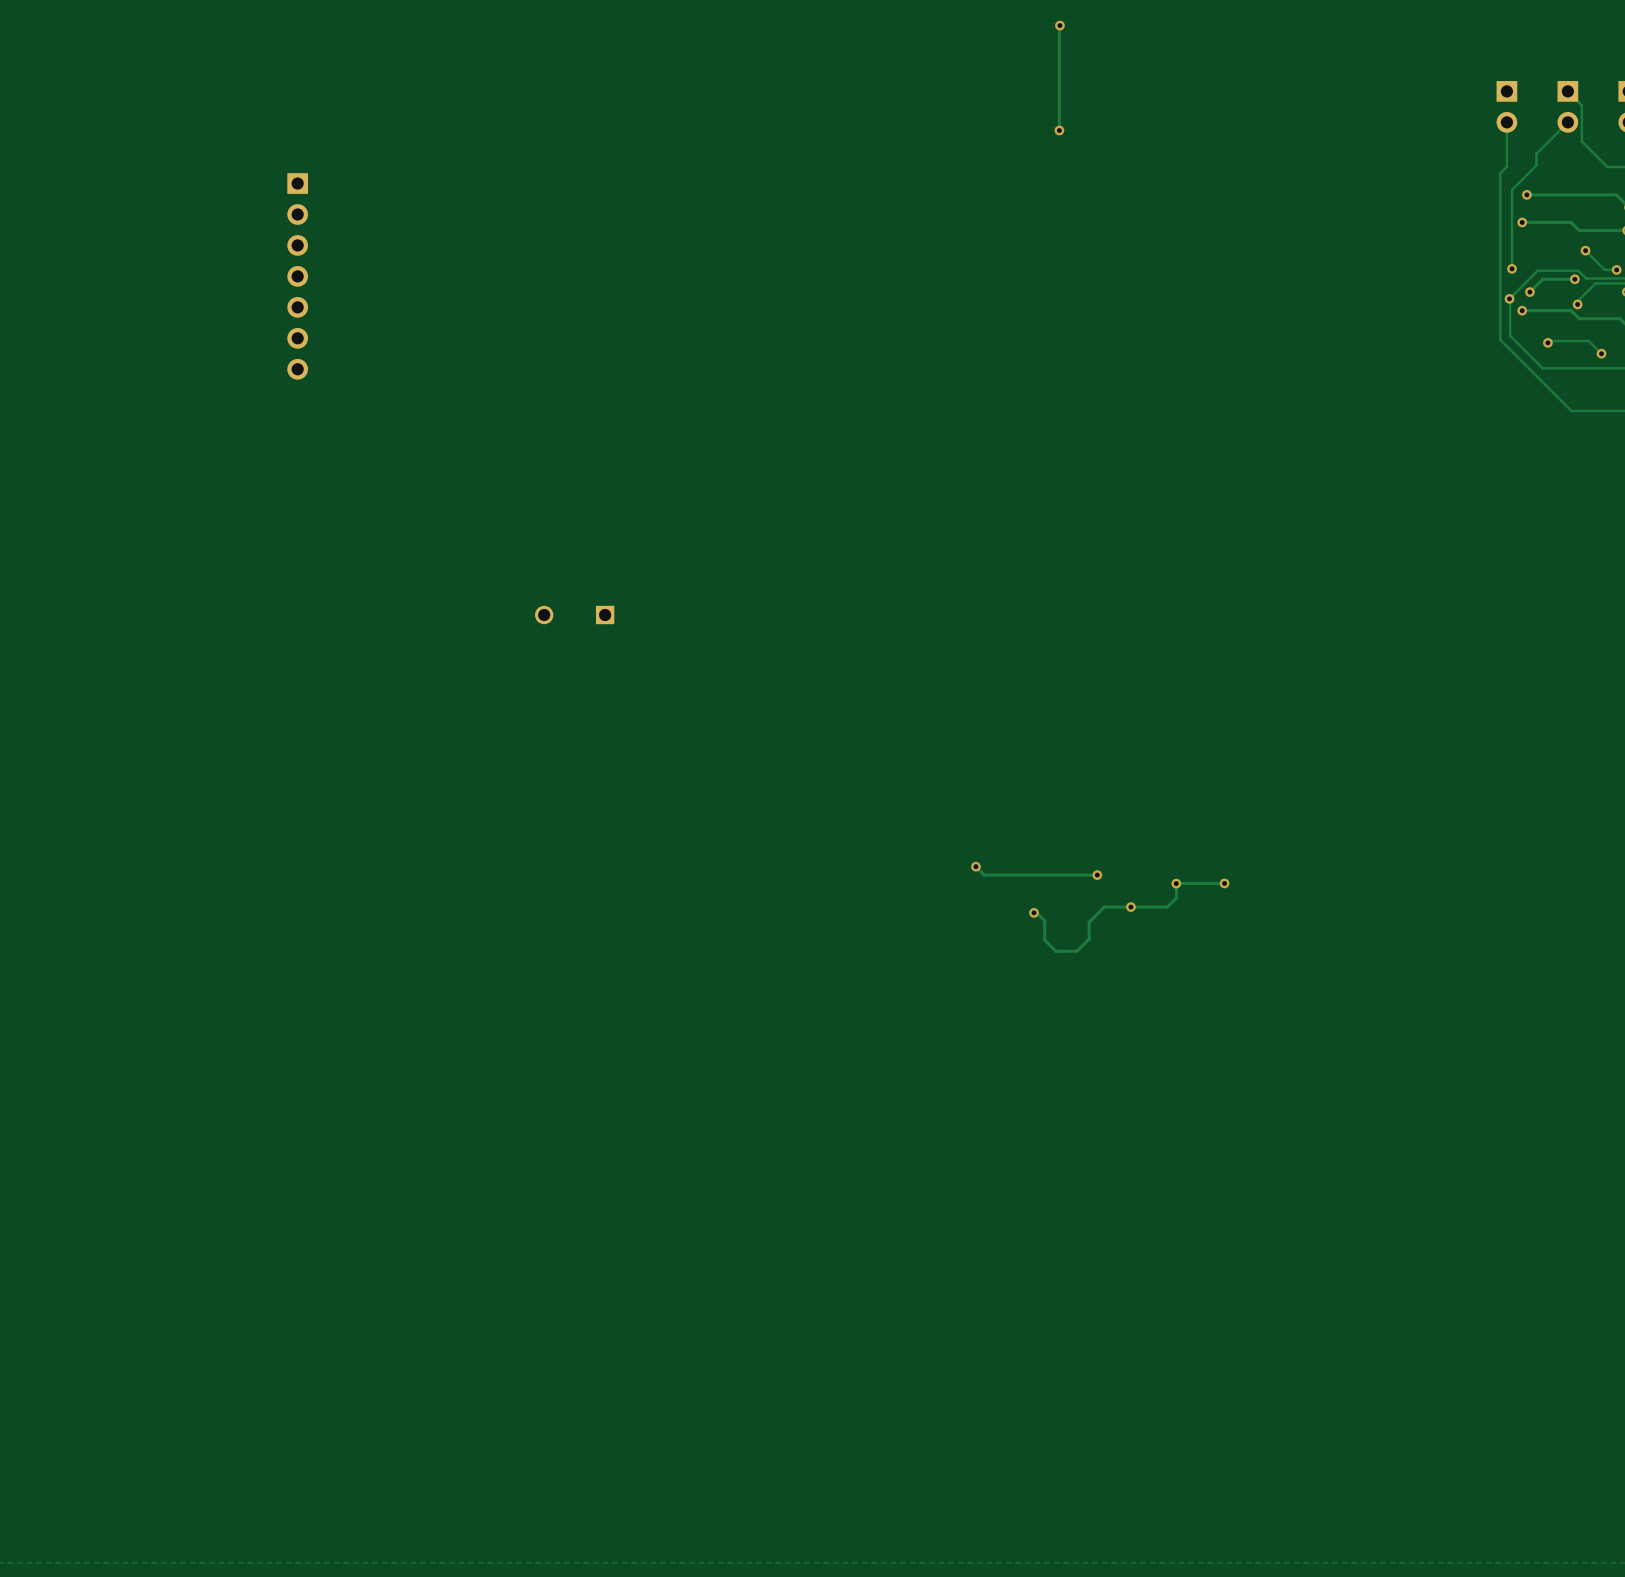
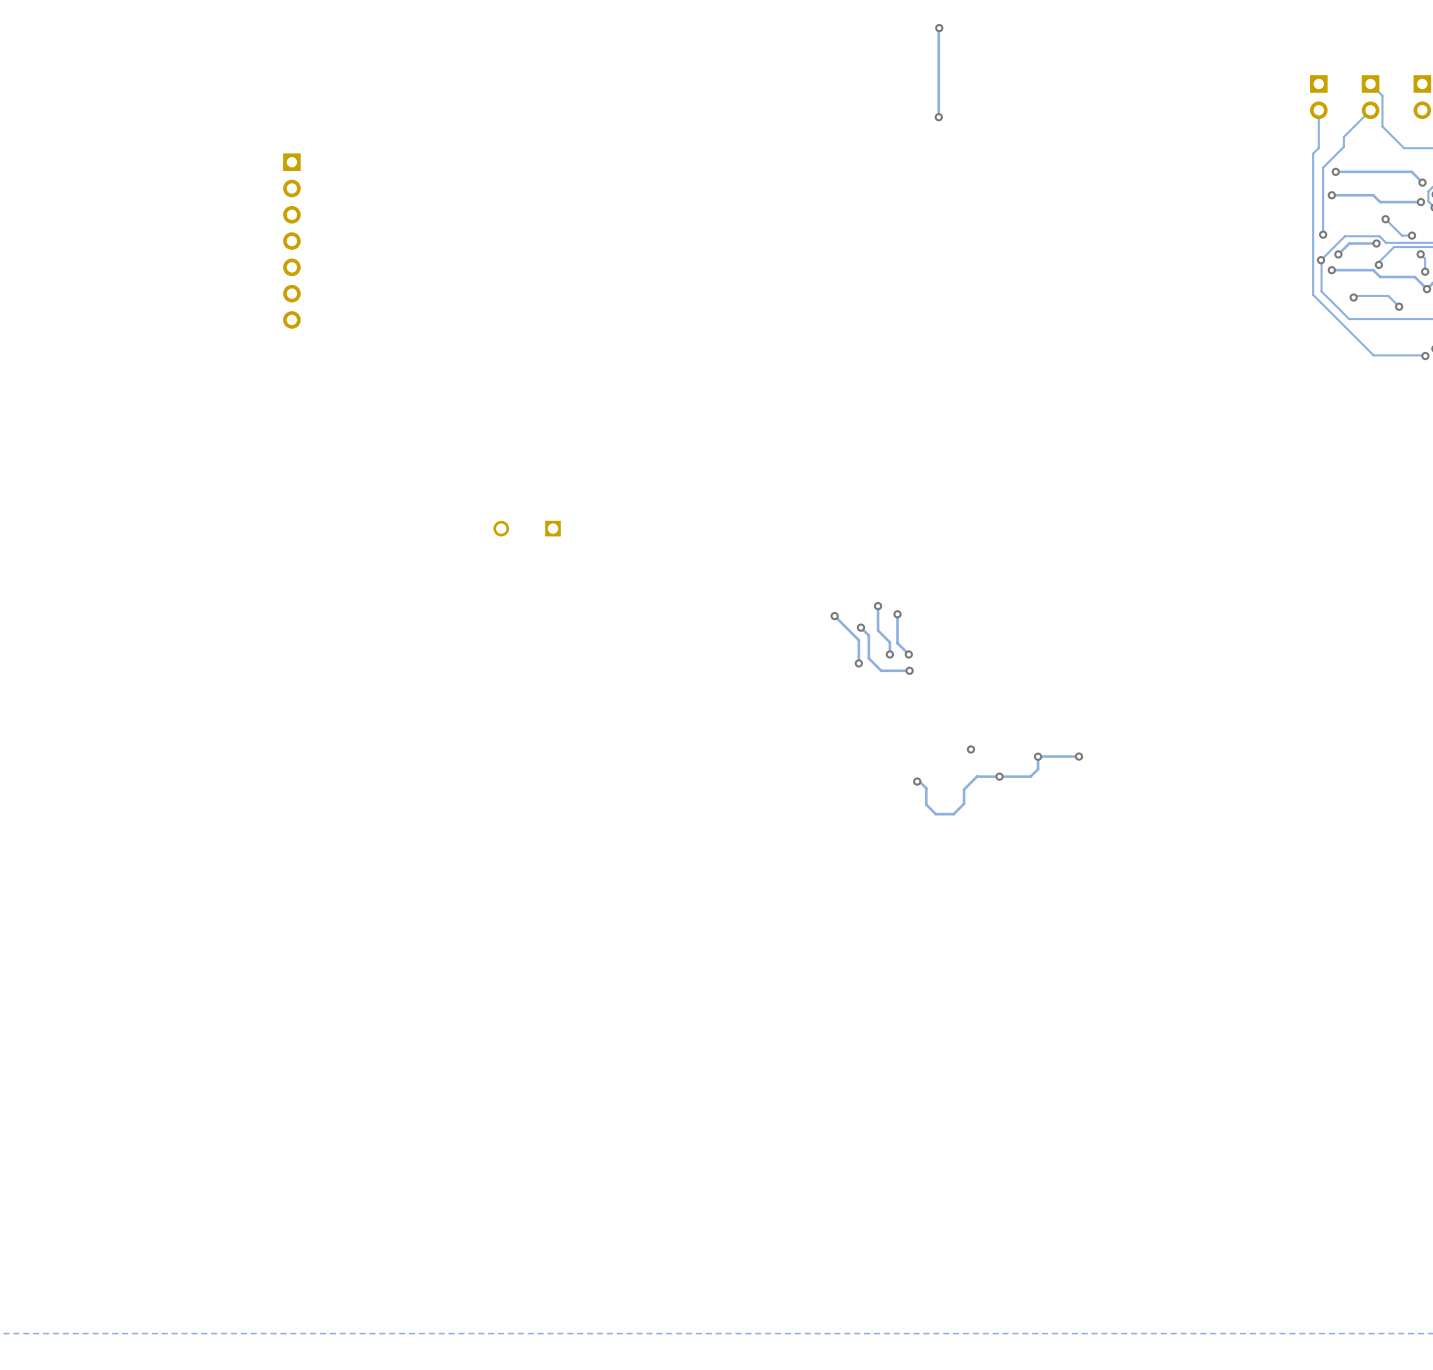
track: none -> (878, 606) (878, 630) (889, 642) (889, 654)
via: none -> (878, 606)
track: none -> (897, 614) (897, 643) (908, 654)
via: none -> (897, 614)
track: none -> (834, 616) (858, 640) (858, 663)
via: none -> (834, 616)
track: none -> (860, 627) (868, 635) (868, 658) (881, 670) (909, 670)
via: none -> (860, 627)
via: none -> (889, 654)
via: none -> (908, 654)
via: none -> (858, 663)
via: none -> (909, 670)
track: (975, 866) (984, 875) (1097, 875) -> none
via: (975, 866) -> none

